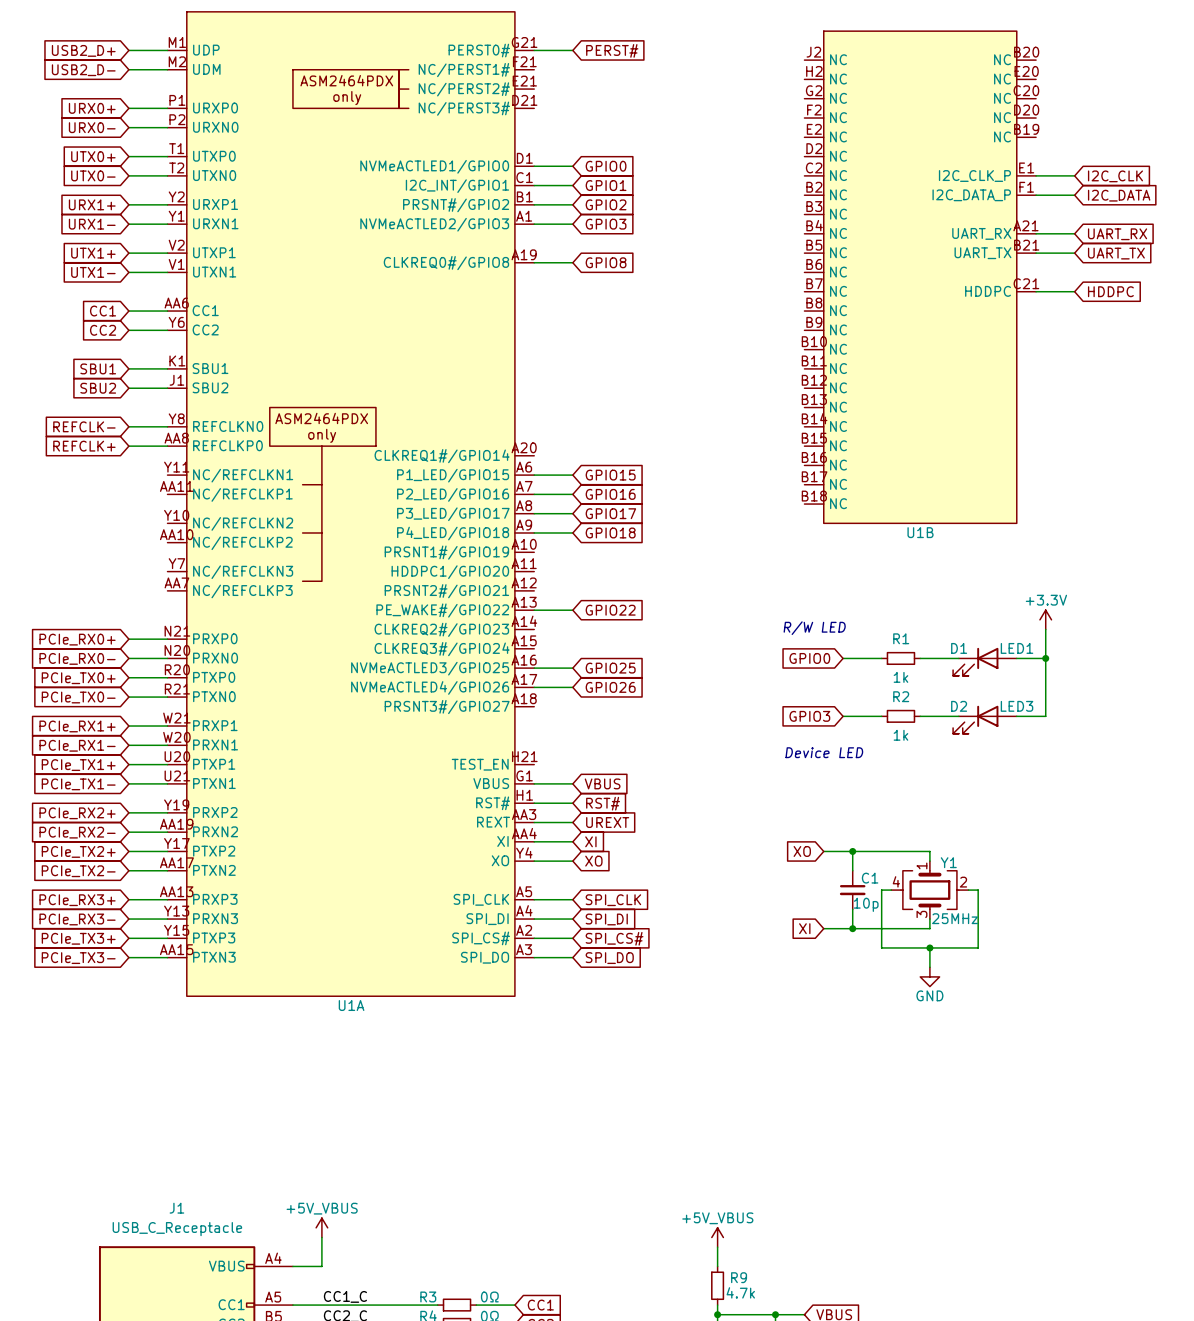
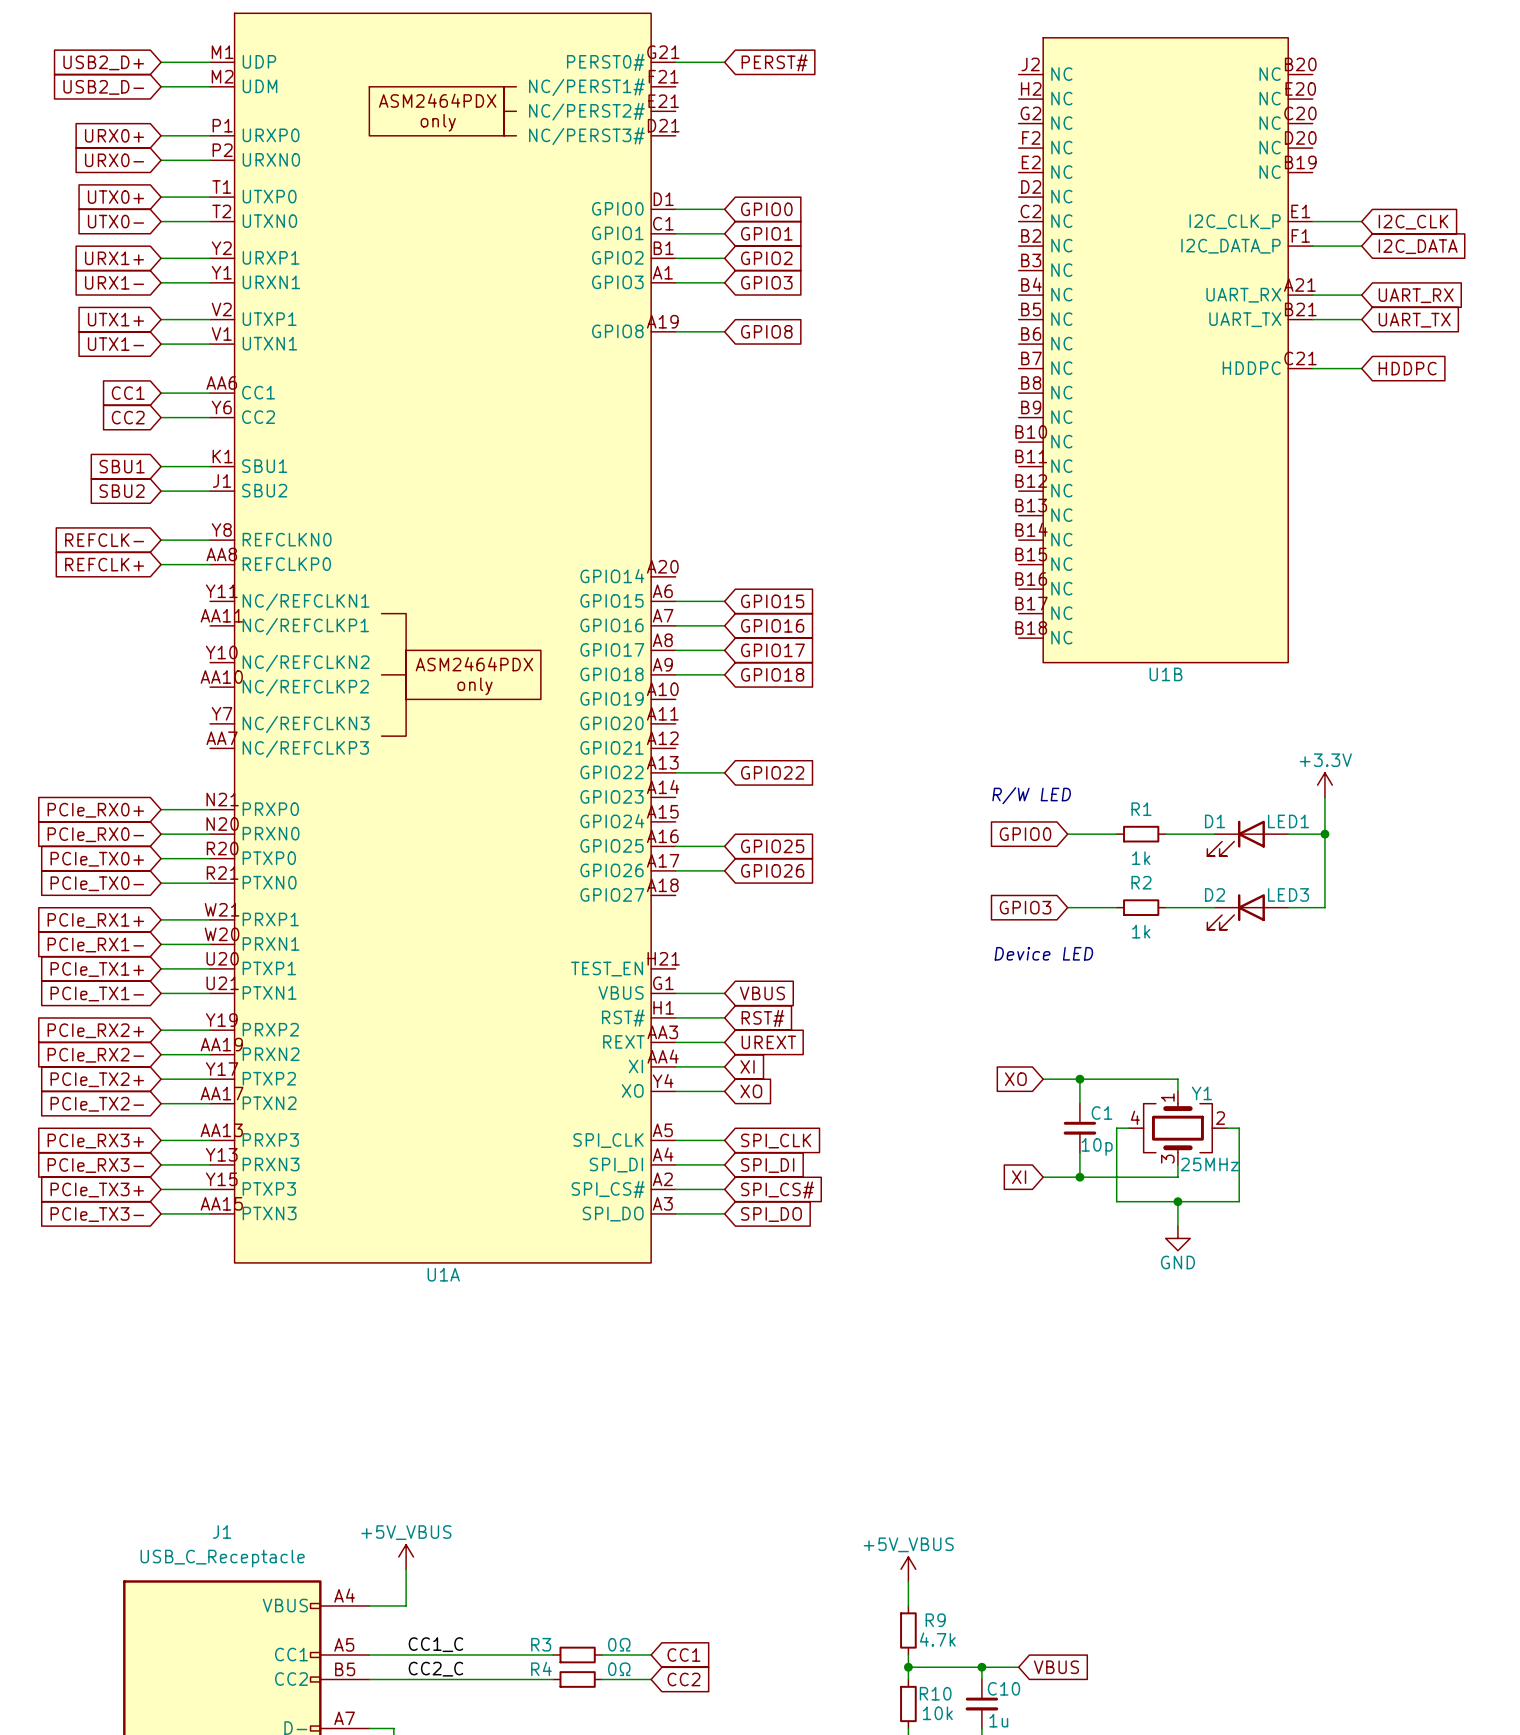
U1A symbol: [167, 11, 535, 997] -> [210, 13, 676, 1263]

